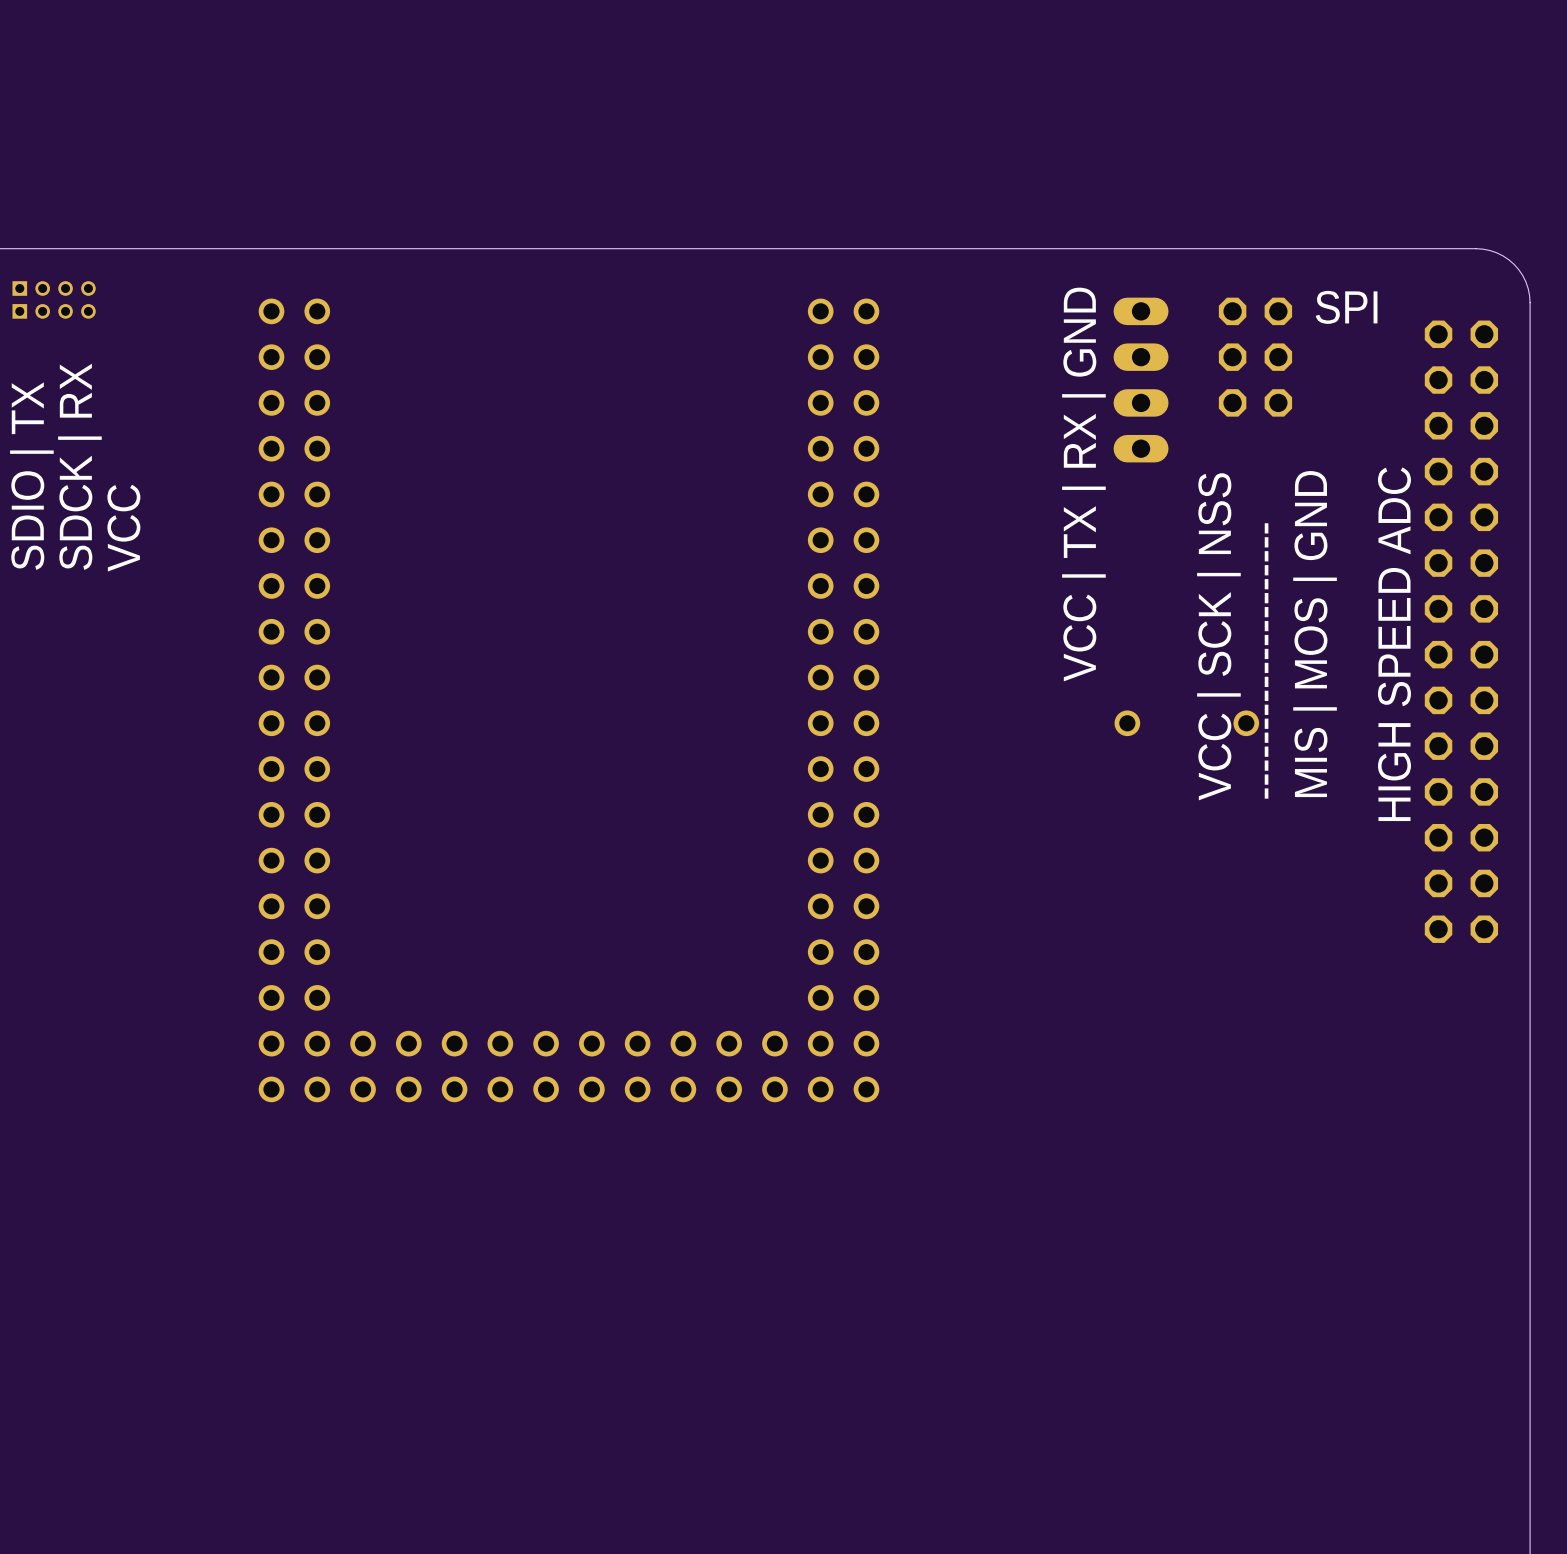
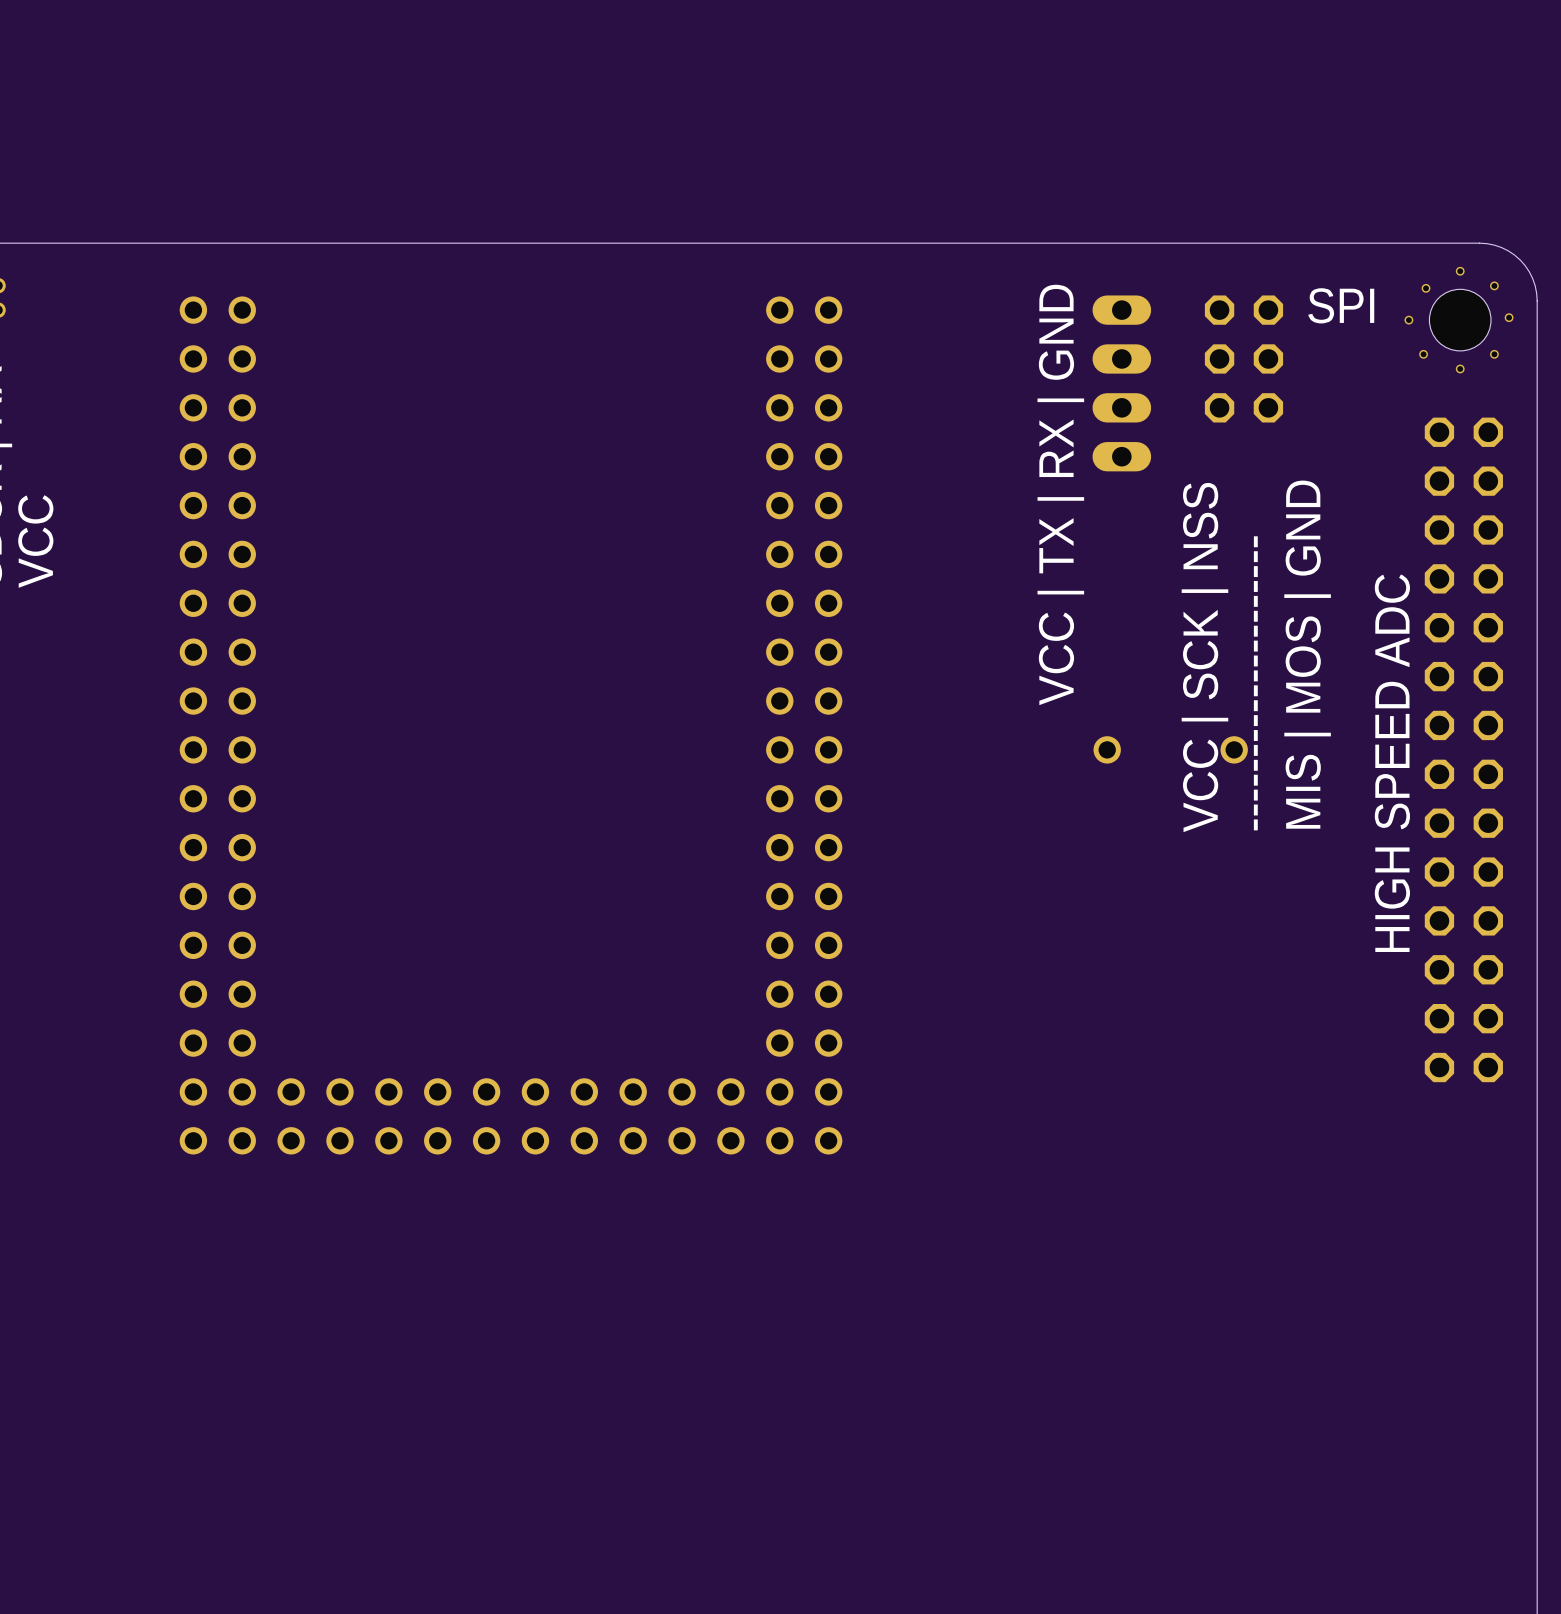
part: none -> (1459, 320)
part position: (1461, 631) -> (1463, 749)
text position: HIGH SPEED ADC (1394, 644) -> HIGH SPEED ADC (1392, 763)

